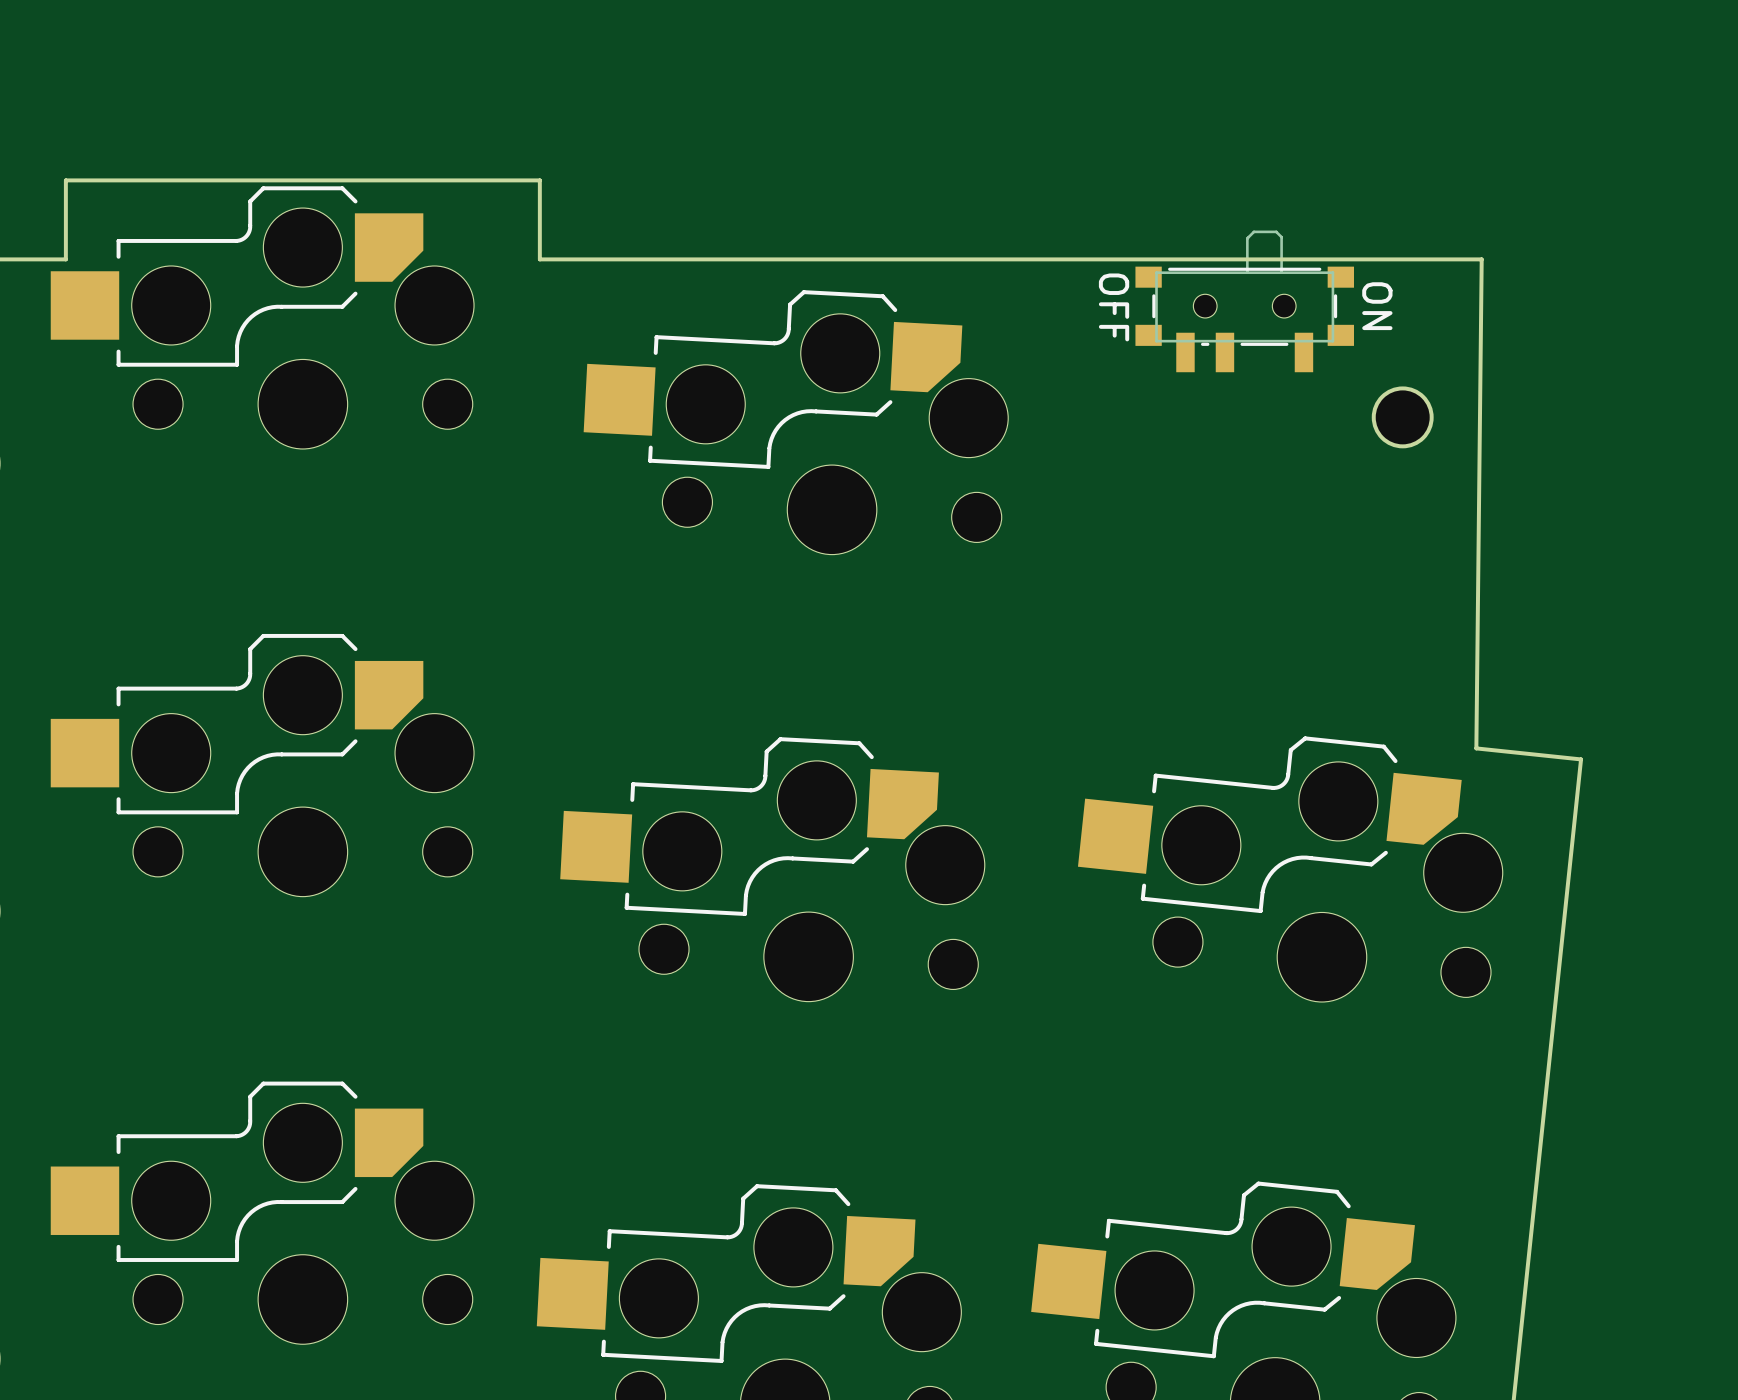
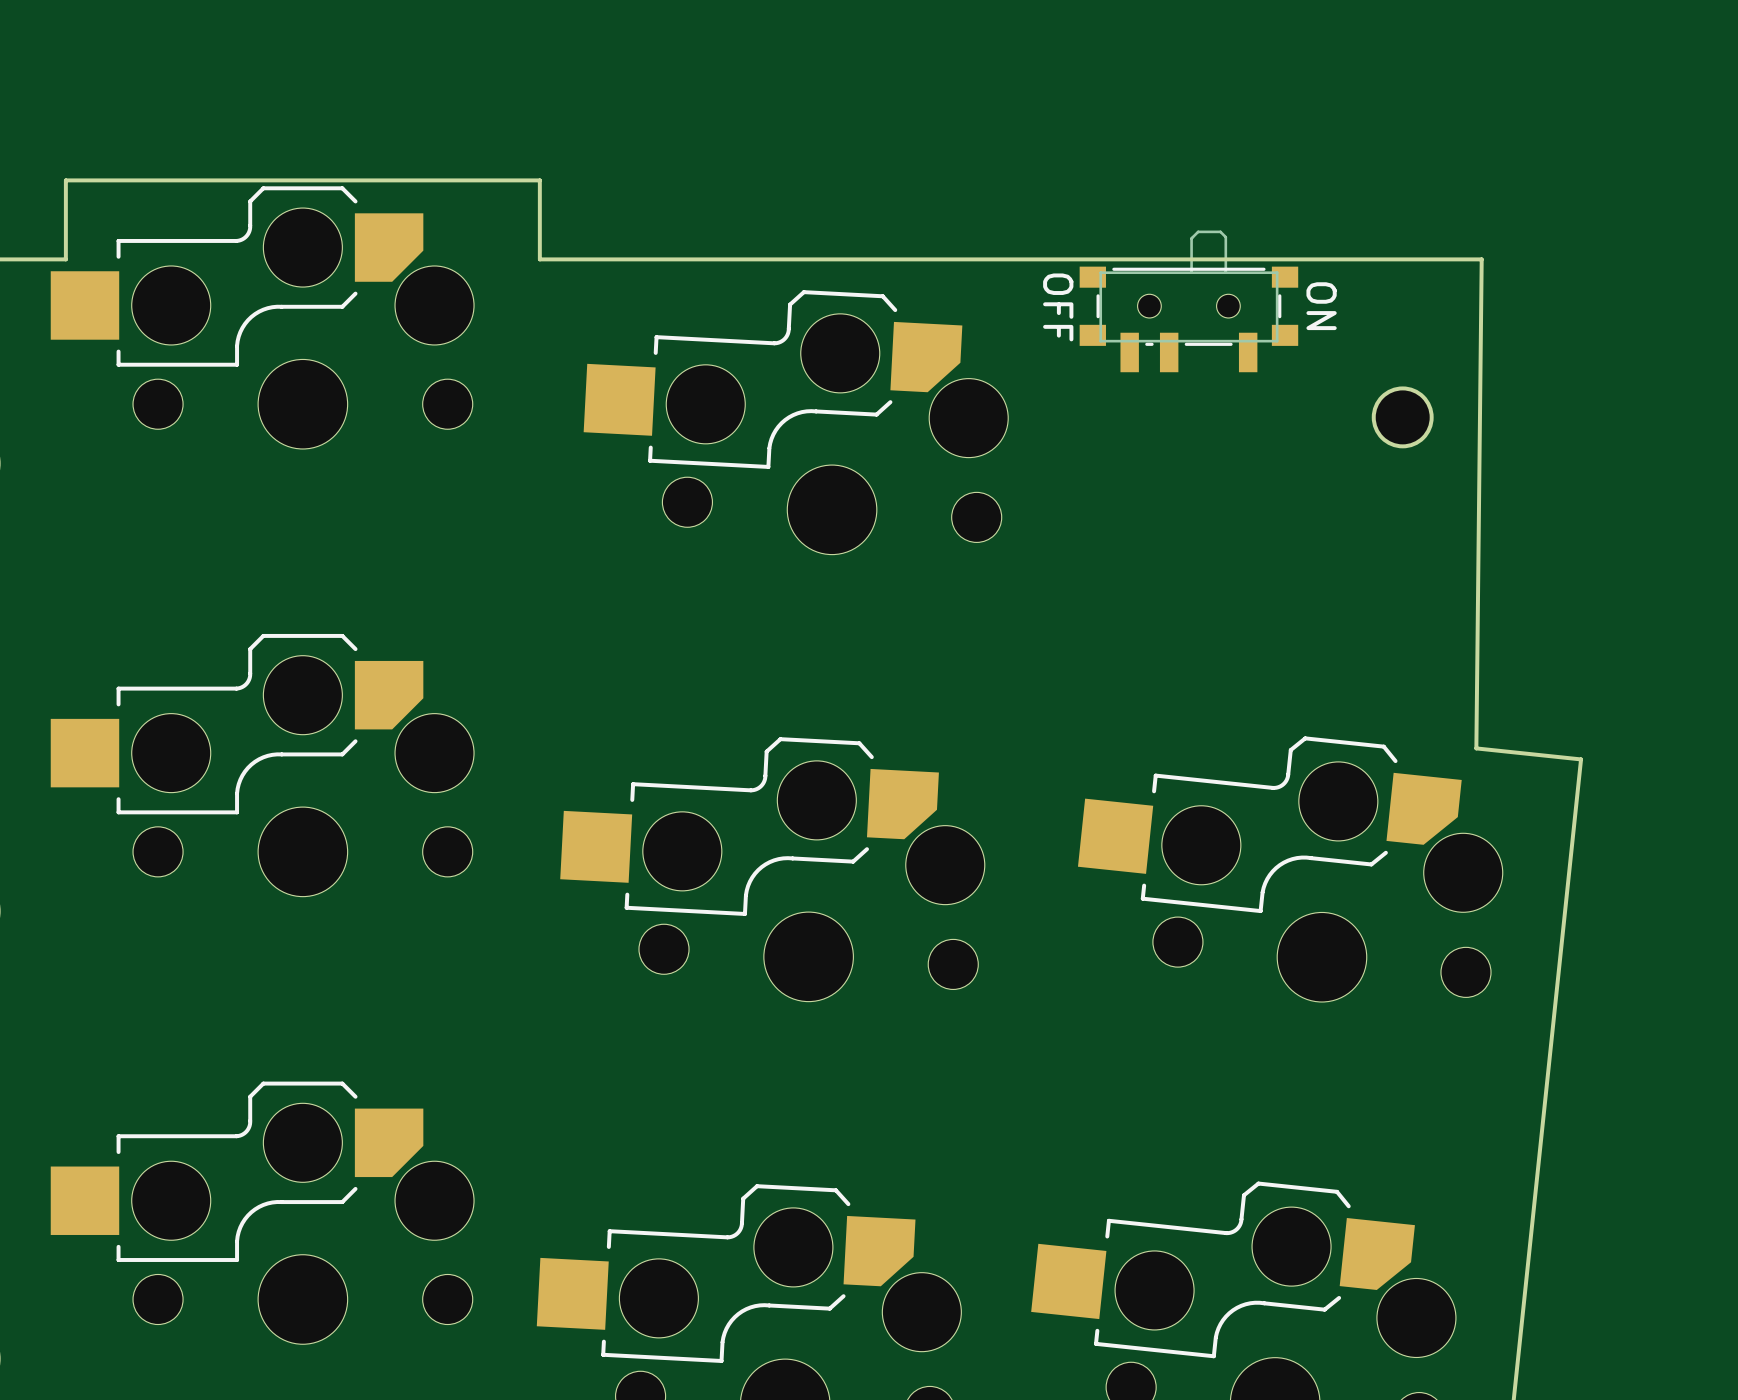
part position: (1244, 301) -> (1188, 301)

